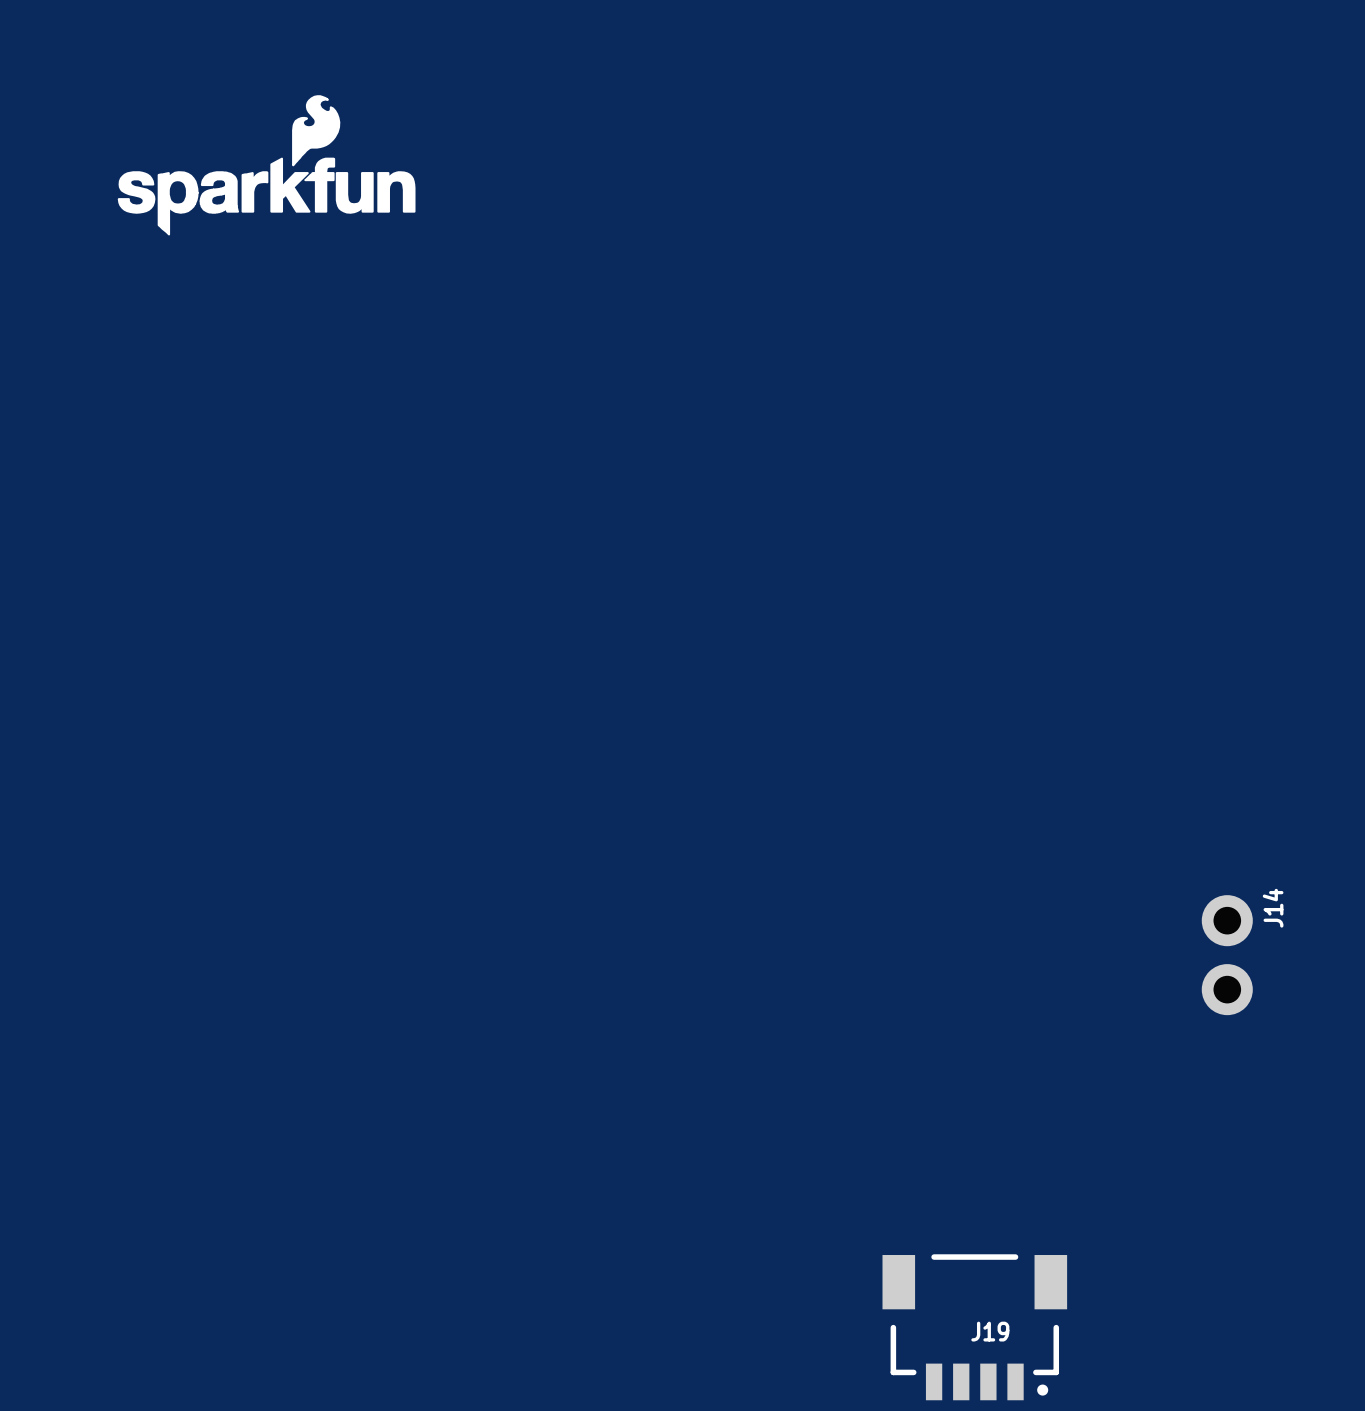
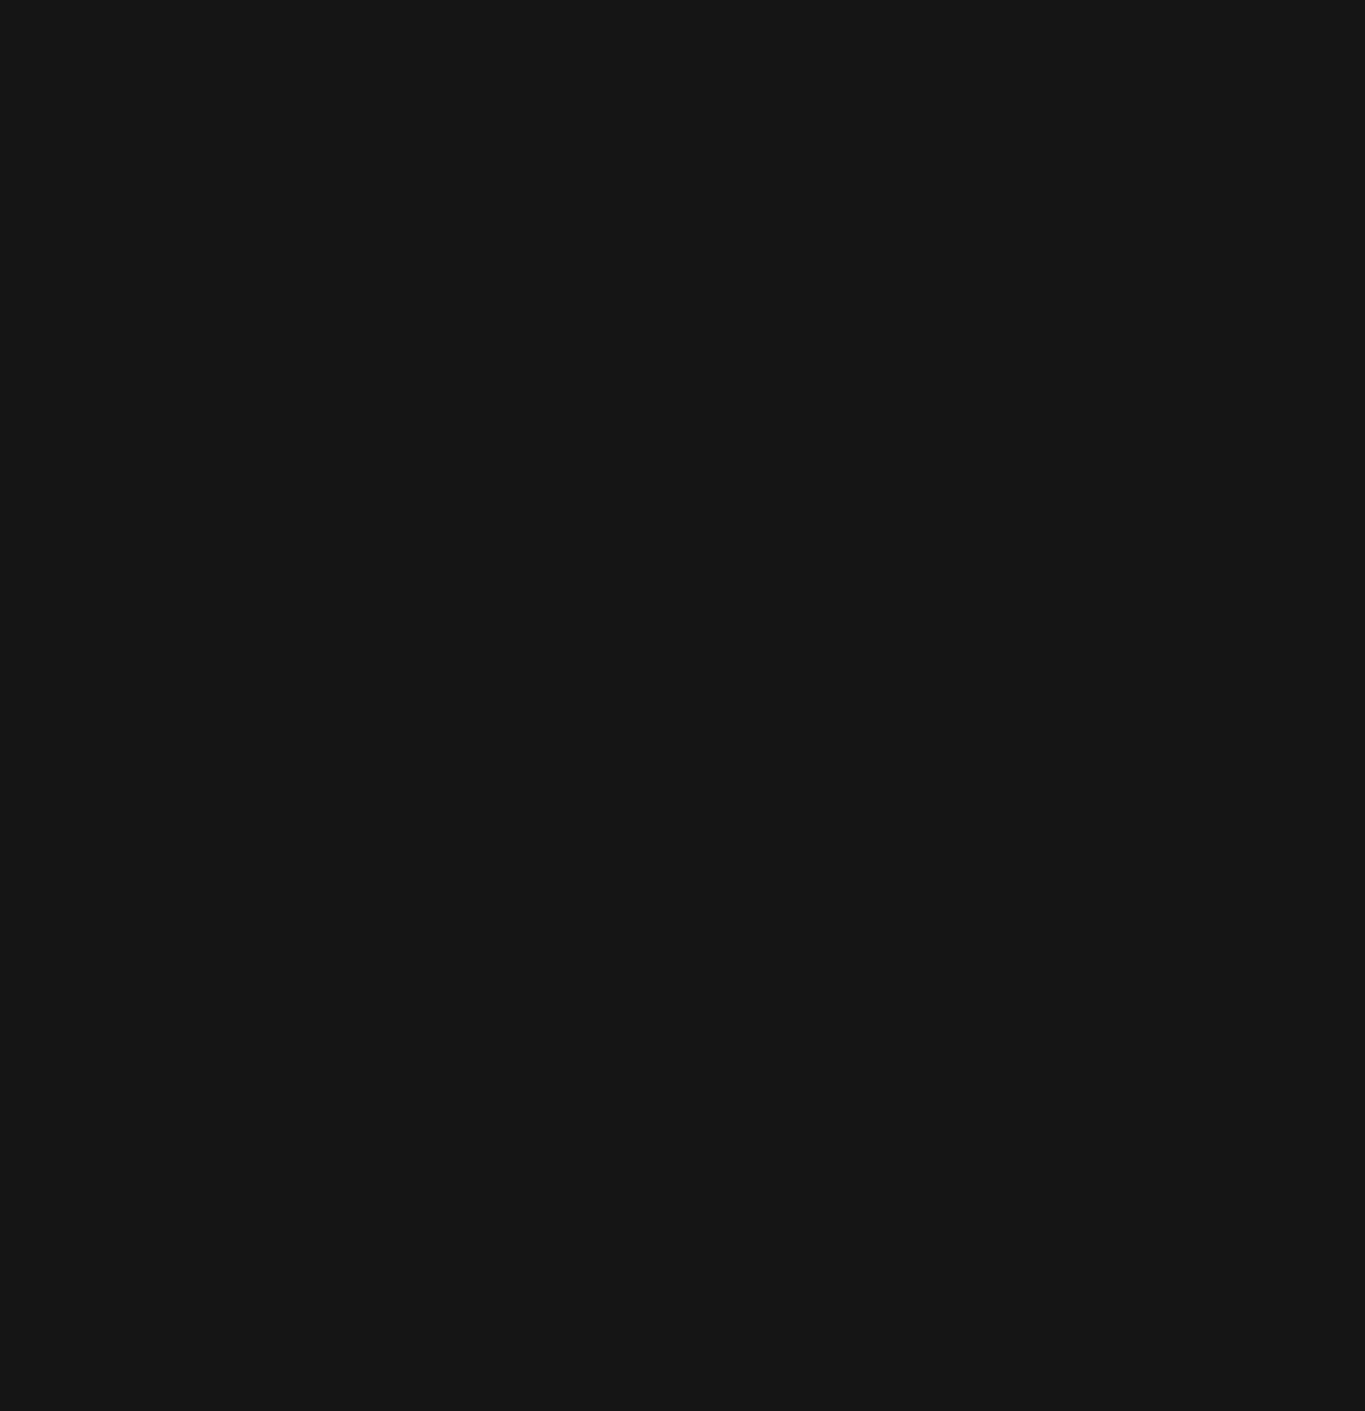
drawing: [117, 95, 416, 236] -> none
J14: (1227, 955) -> none
J19: (974, 1327) -> none

